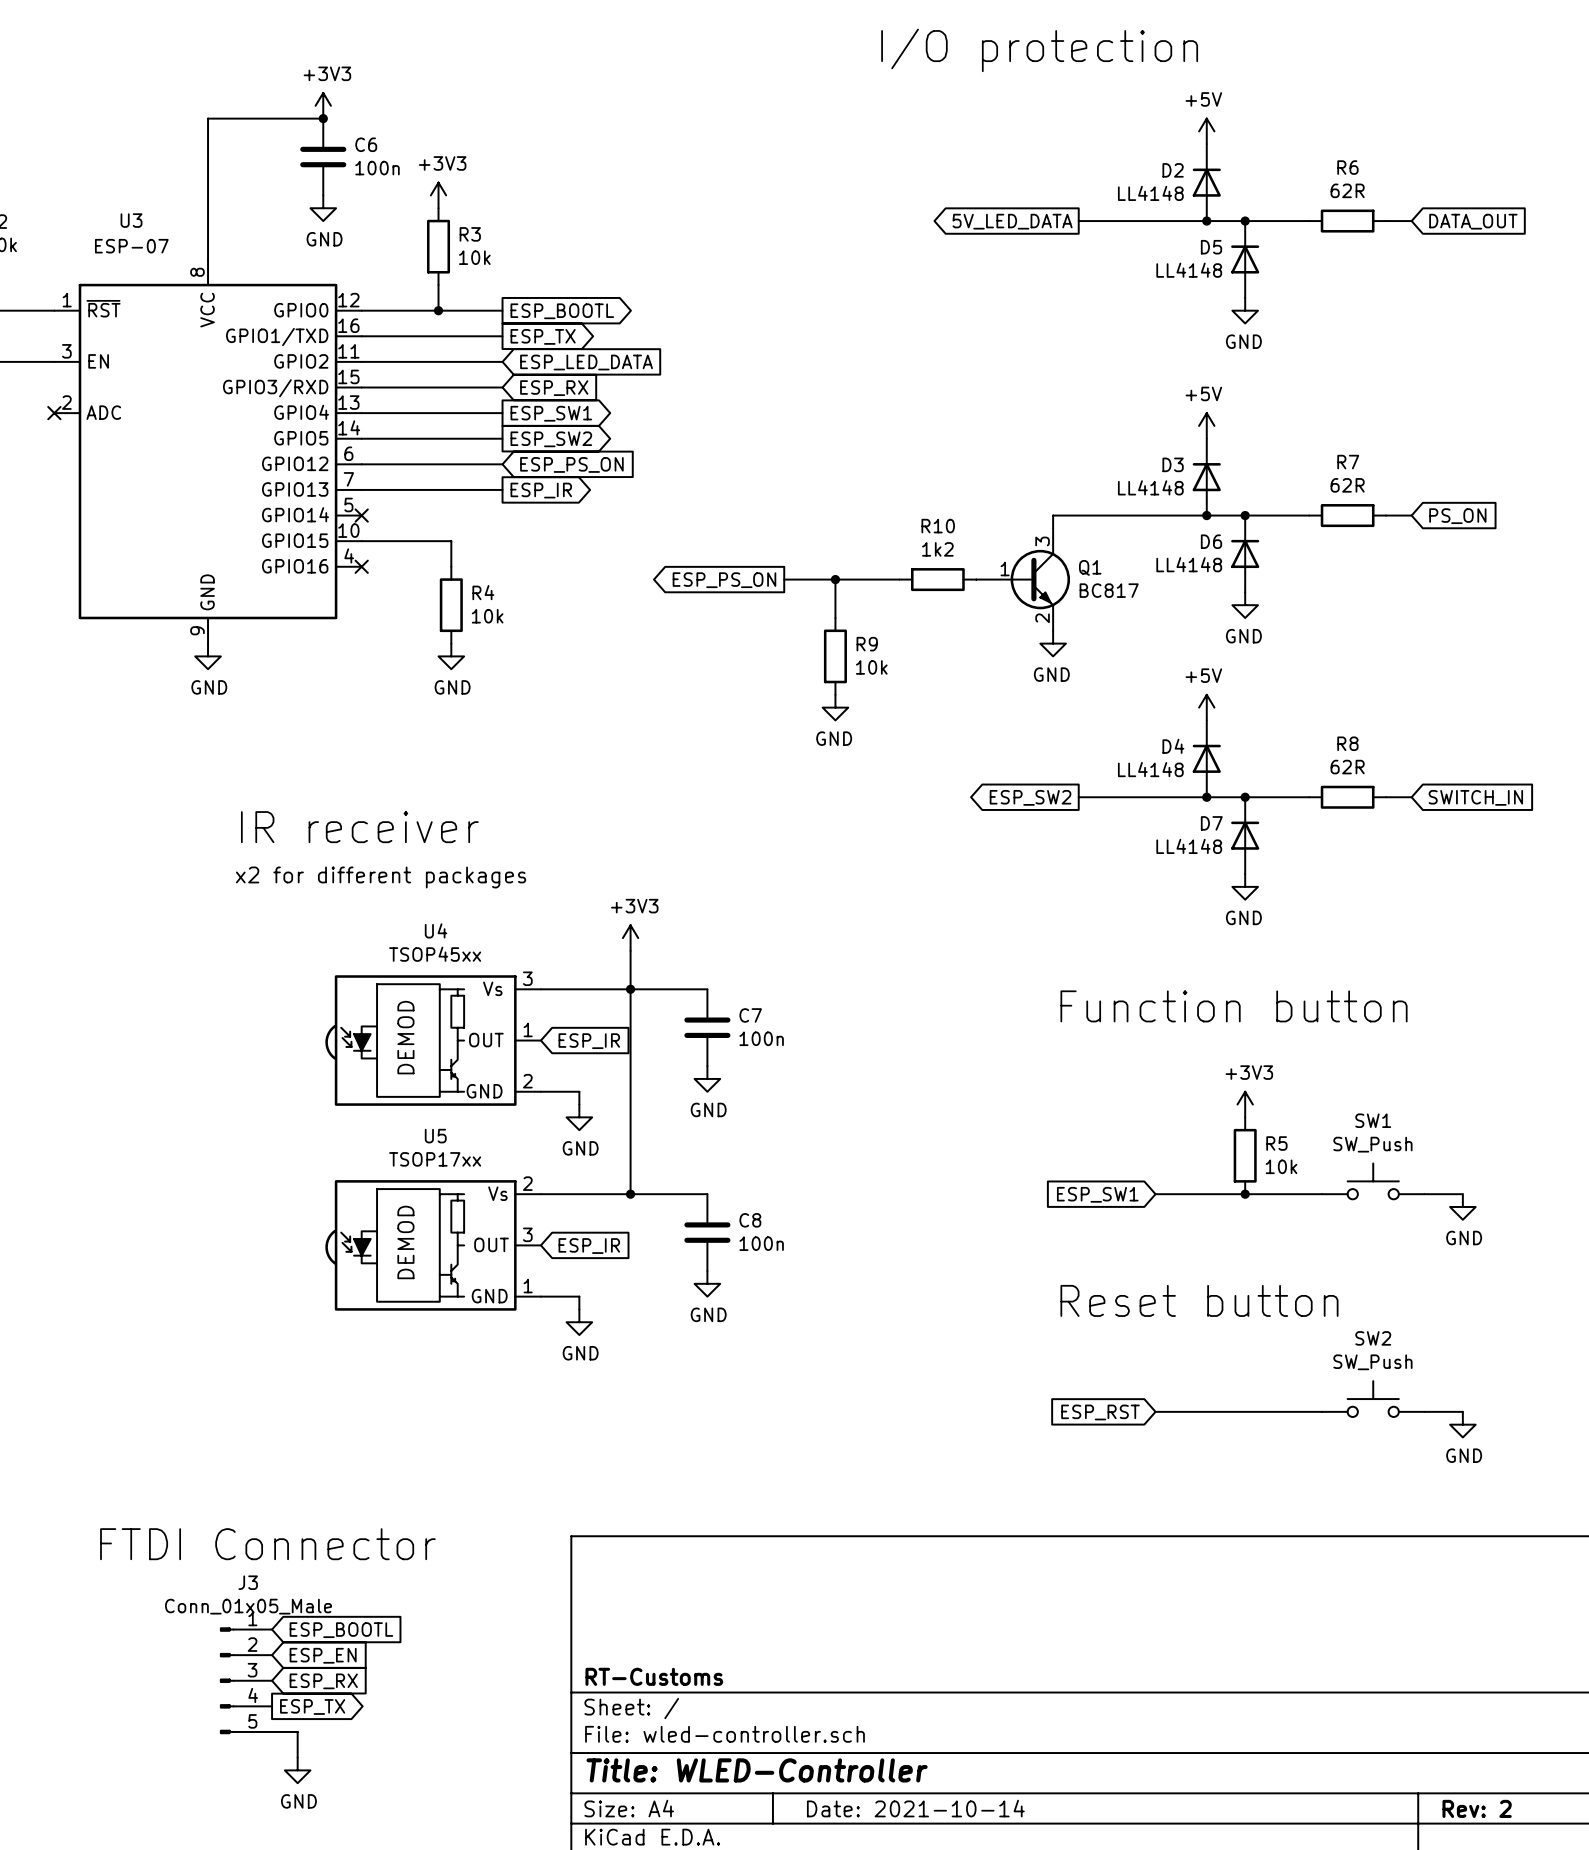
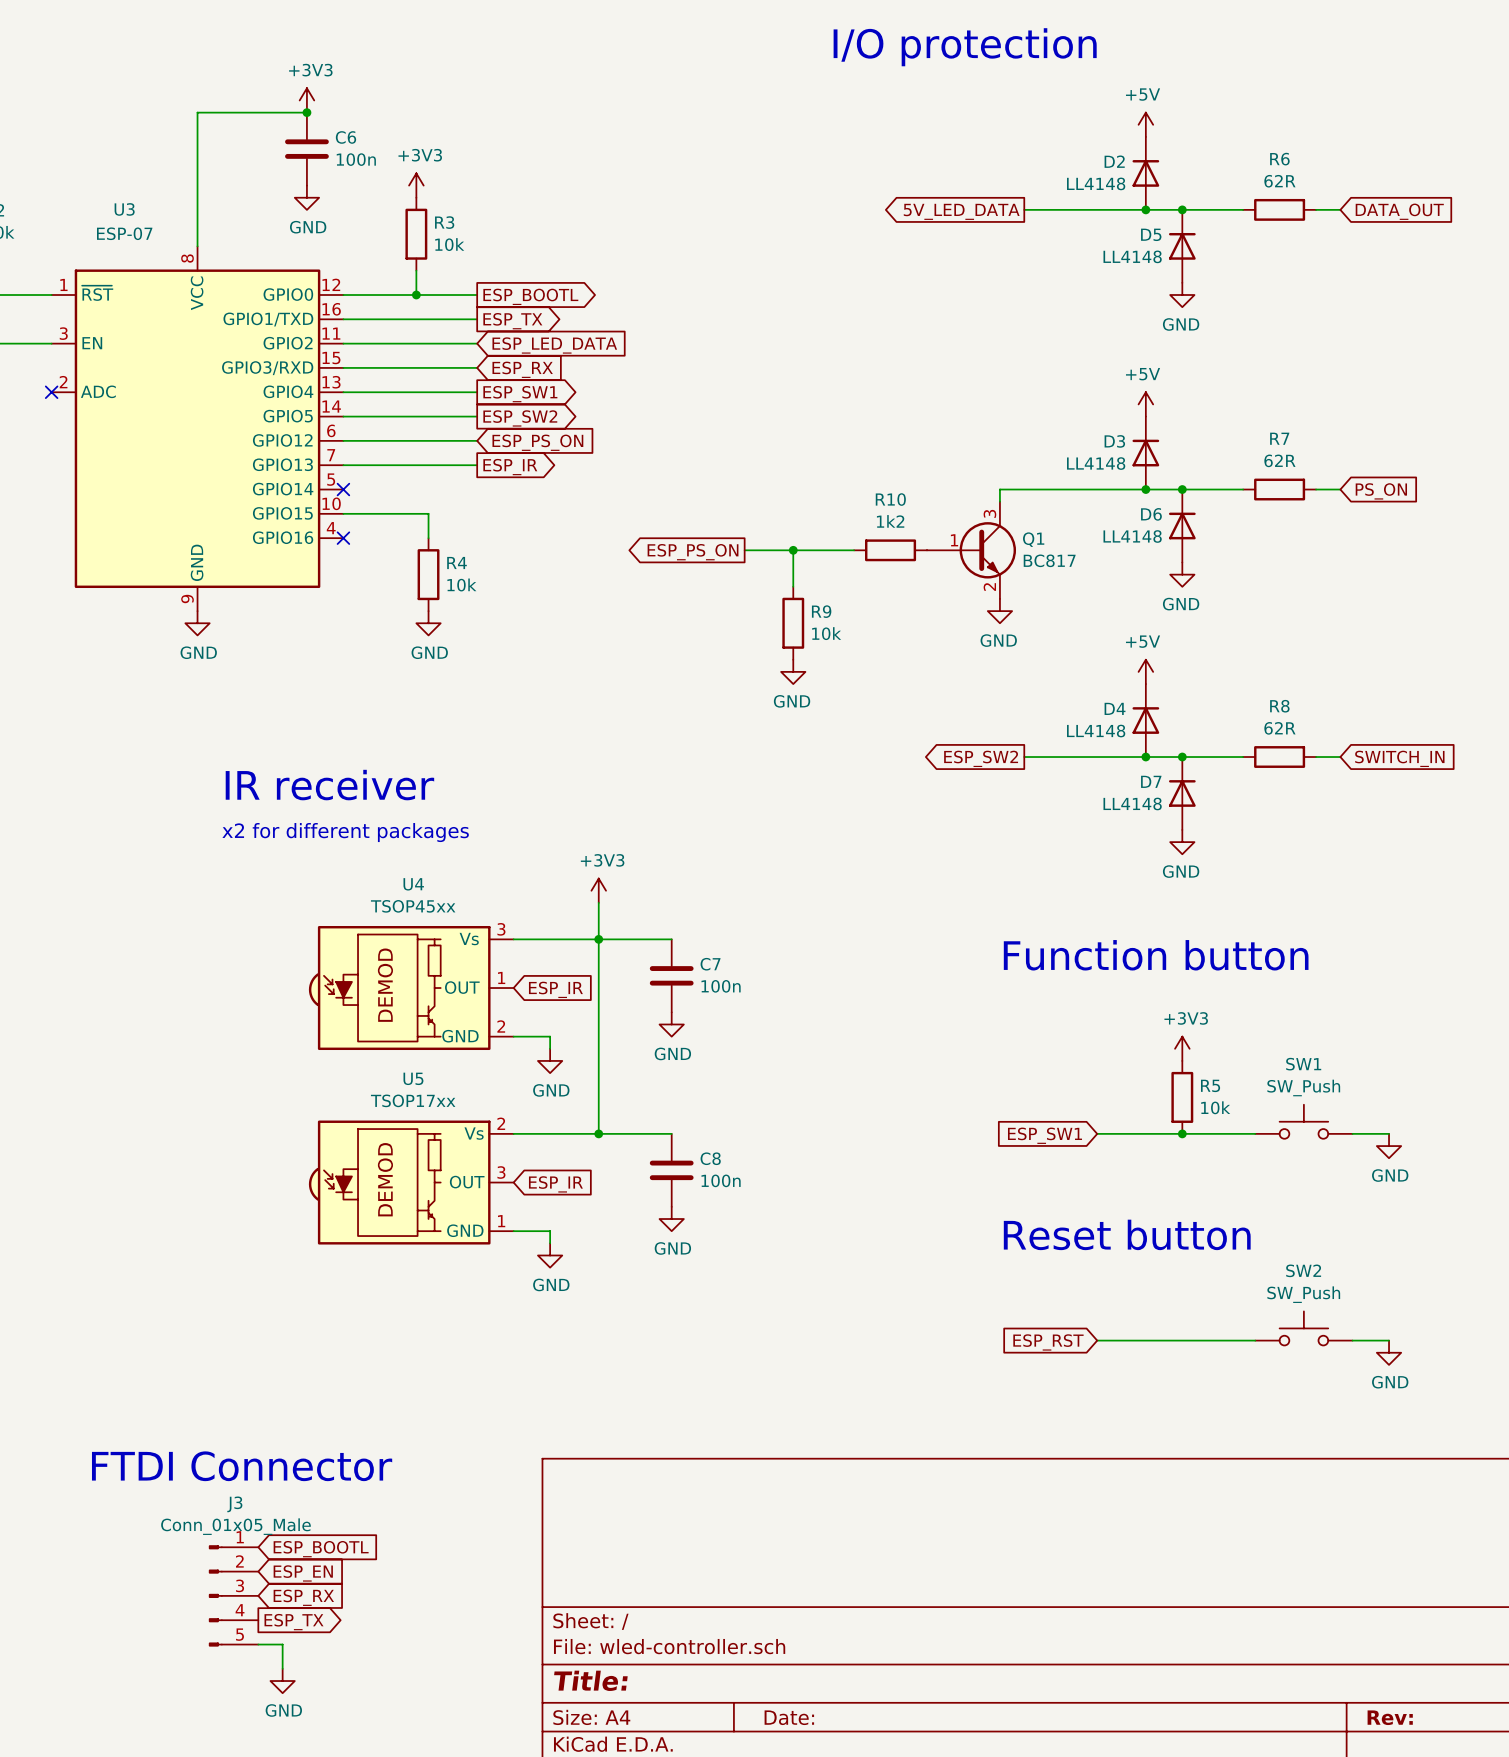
title block: RT-Customs (654, 1676) -> none
title block: Title: WLED-Controller (757, 1770) -> Title: (590, 1680)
title block: Date: 2021-10-14 (915, 1808) -> Date: (789, 1717)
title block: Rev: 2 (1477, 1808) -> Rev: (1390, 1717)

